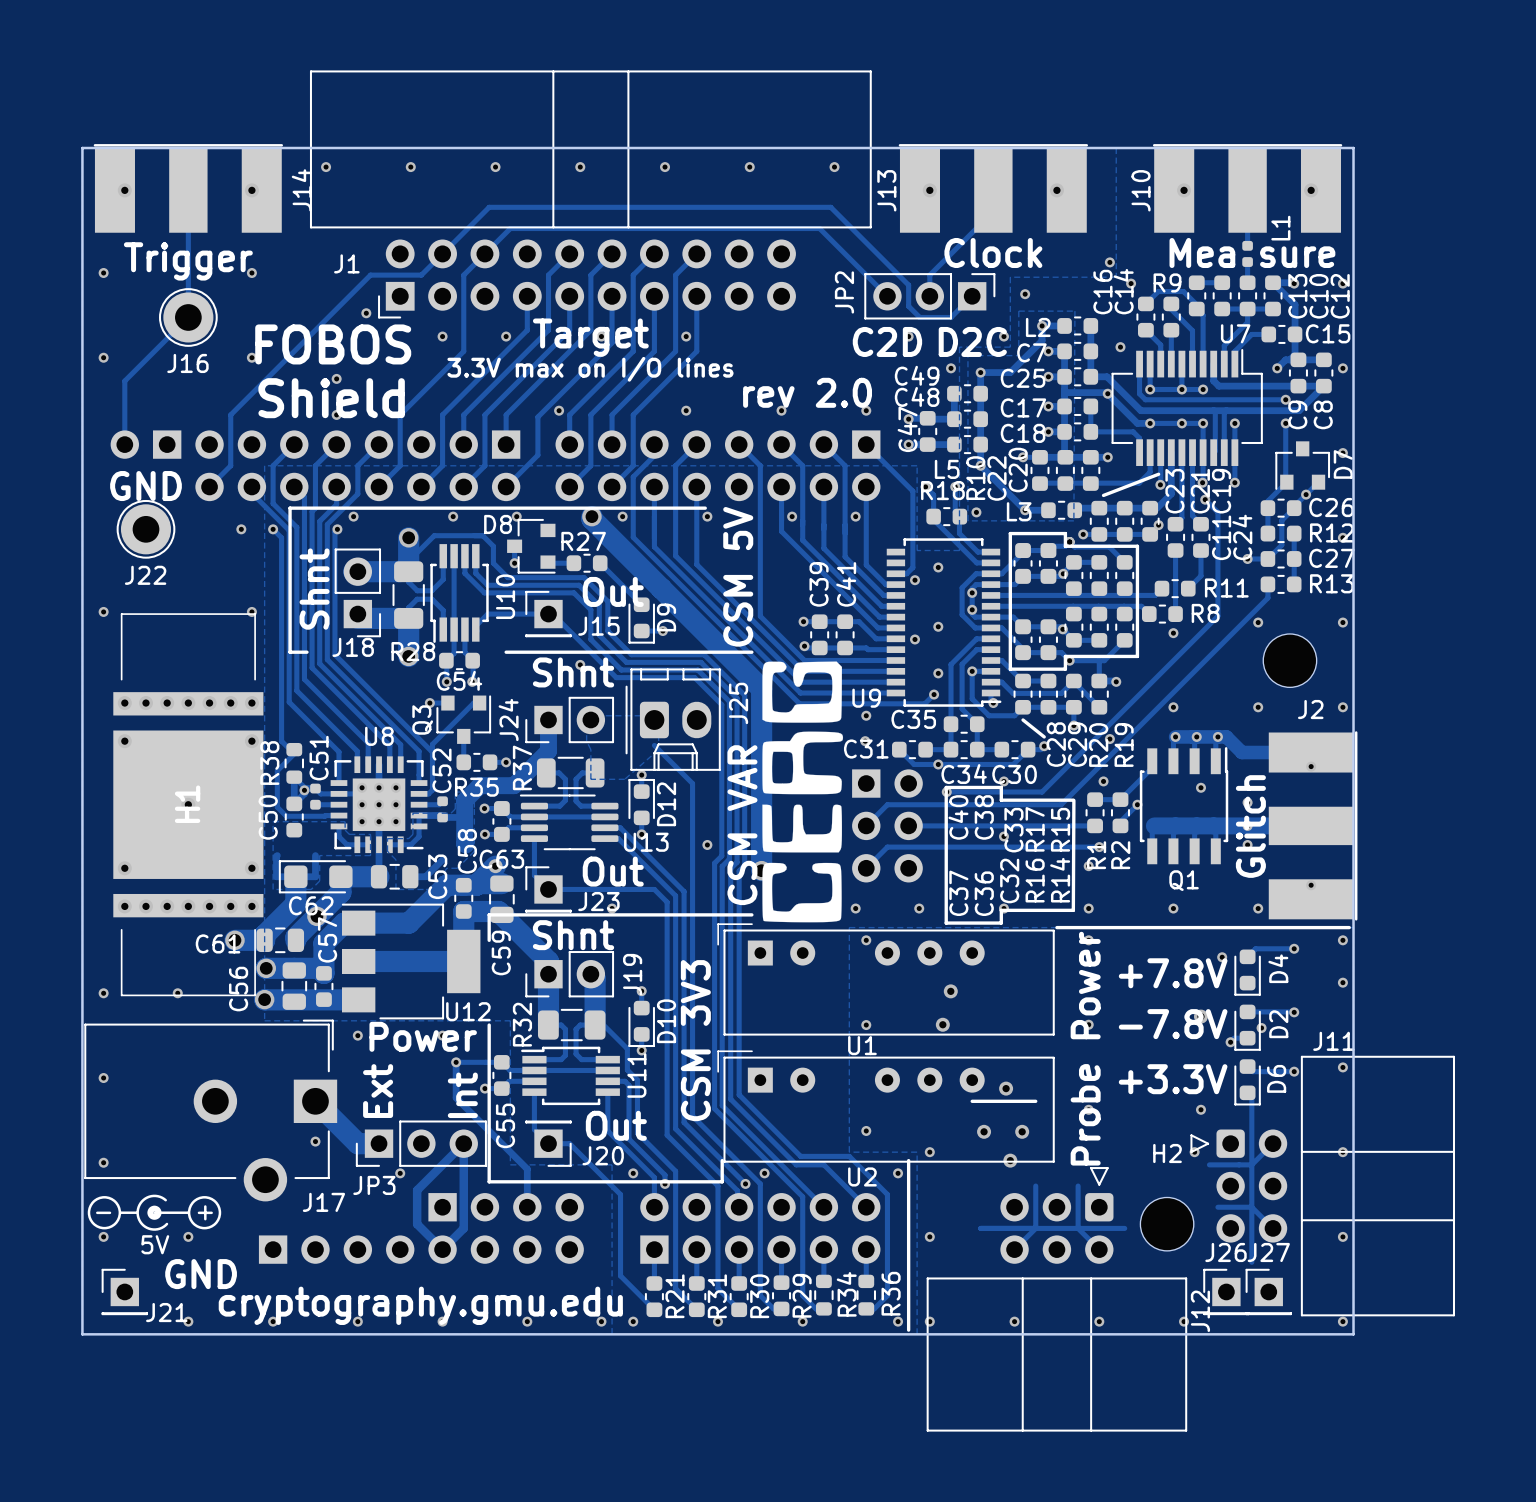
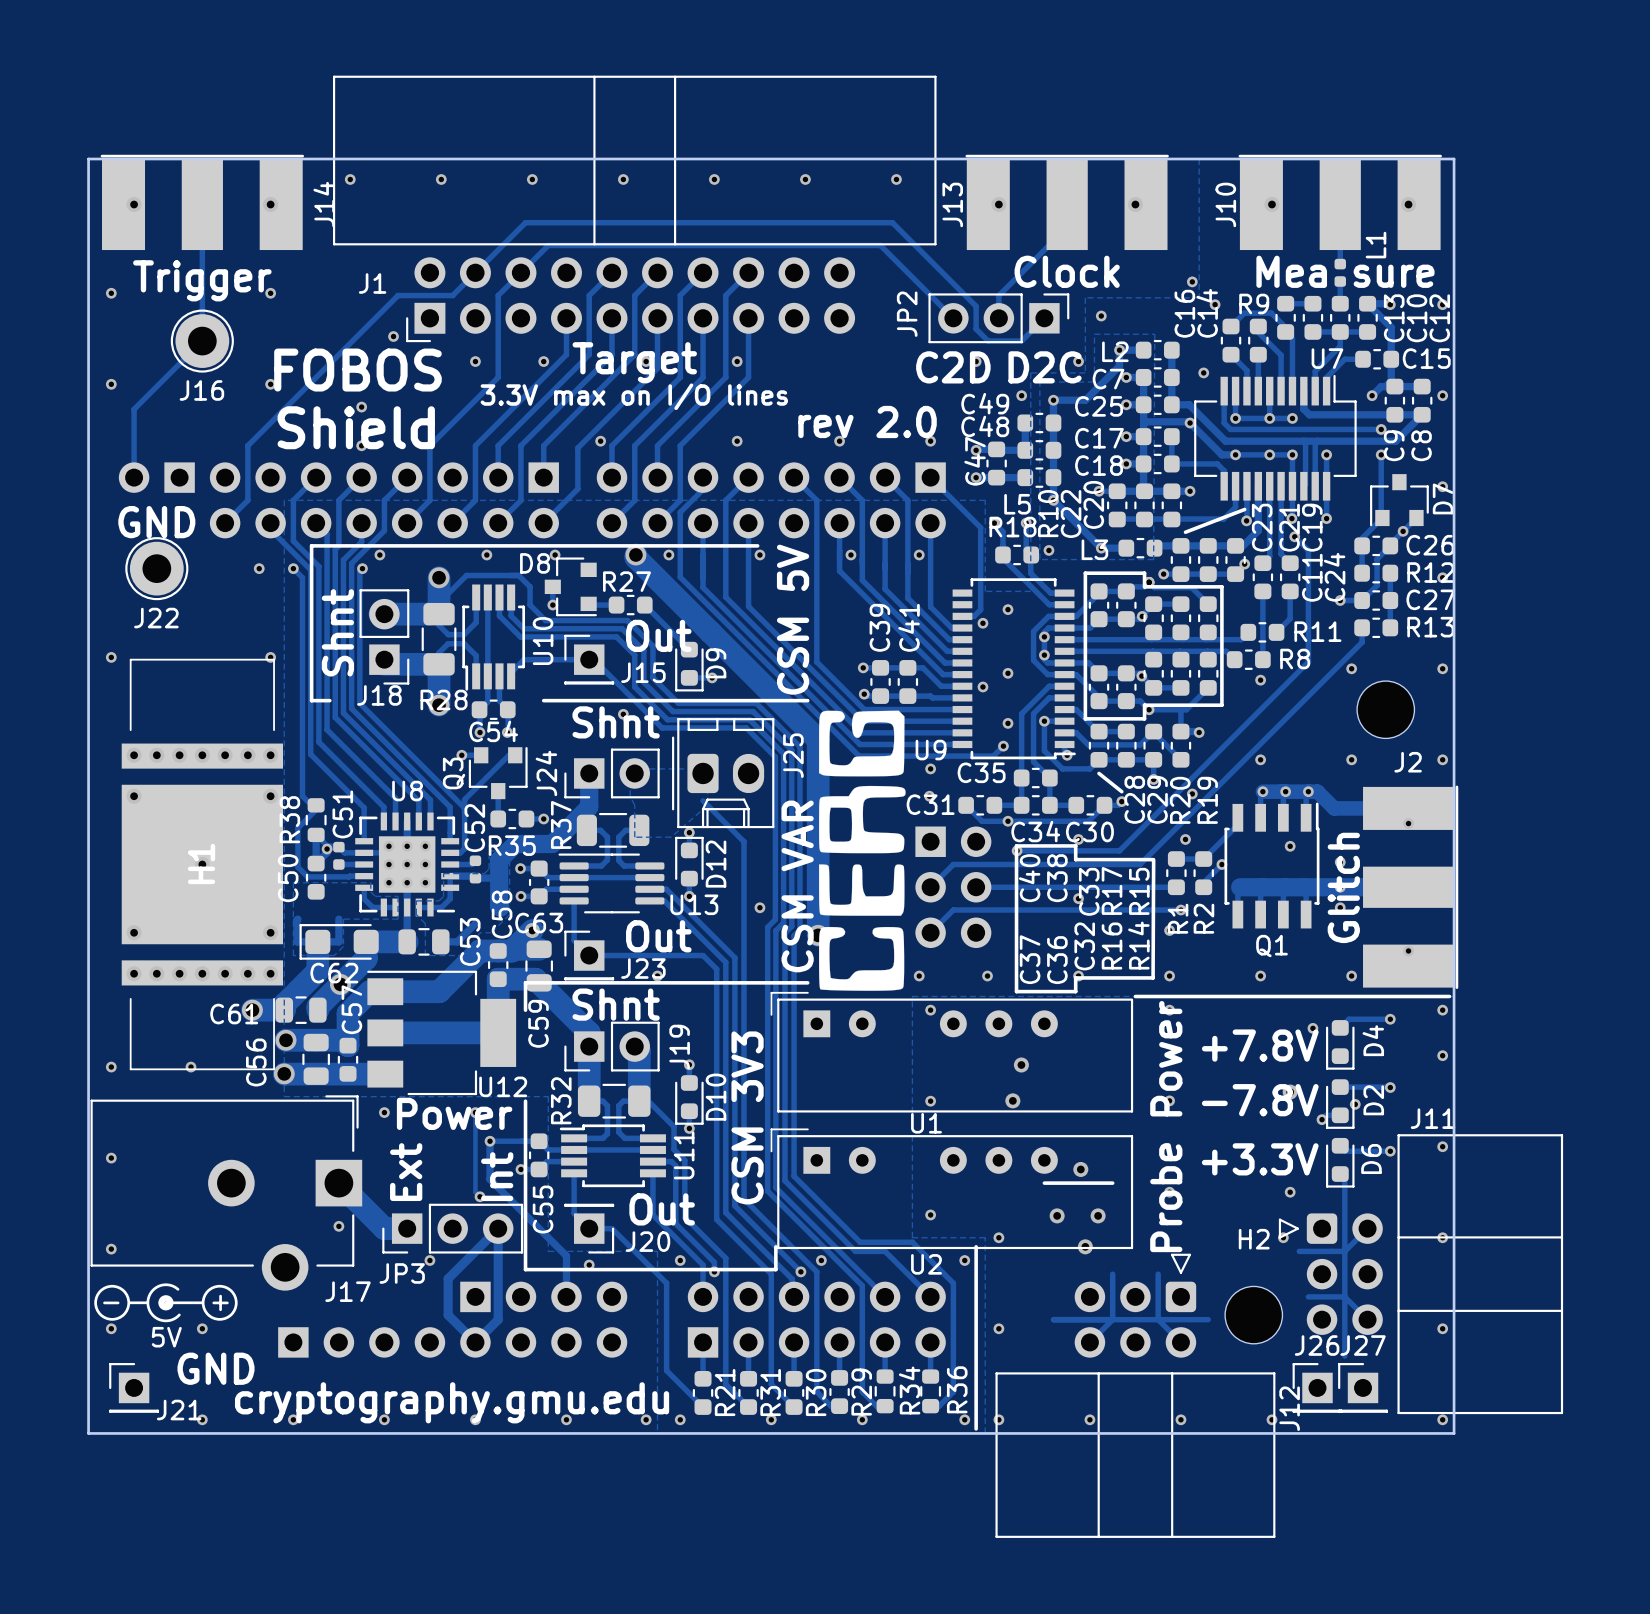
track: none -> (475, 1112) (475, 1192) (480, 1196)
via: none -> (480, 1196)
via: none -> (589, 1265)

